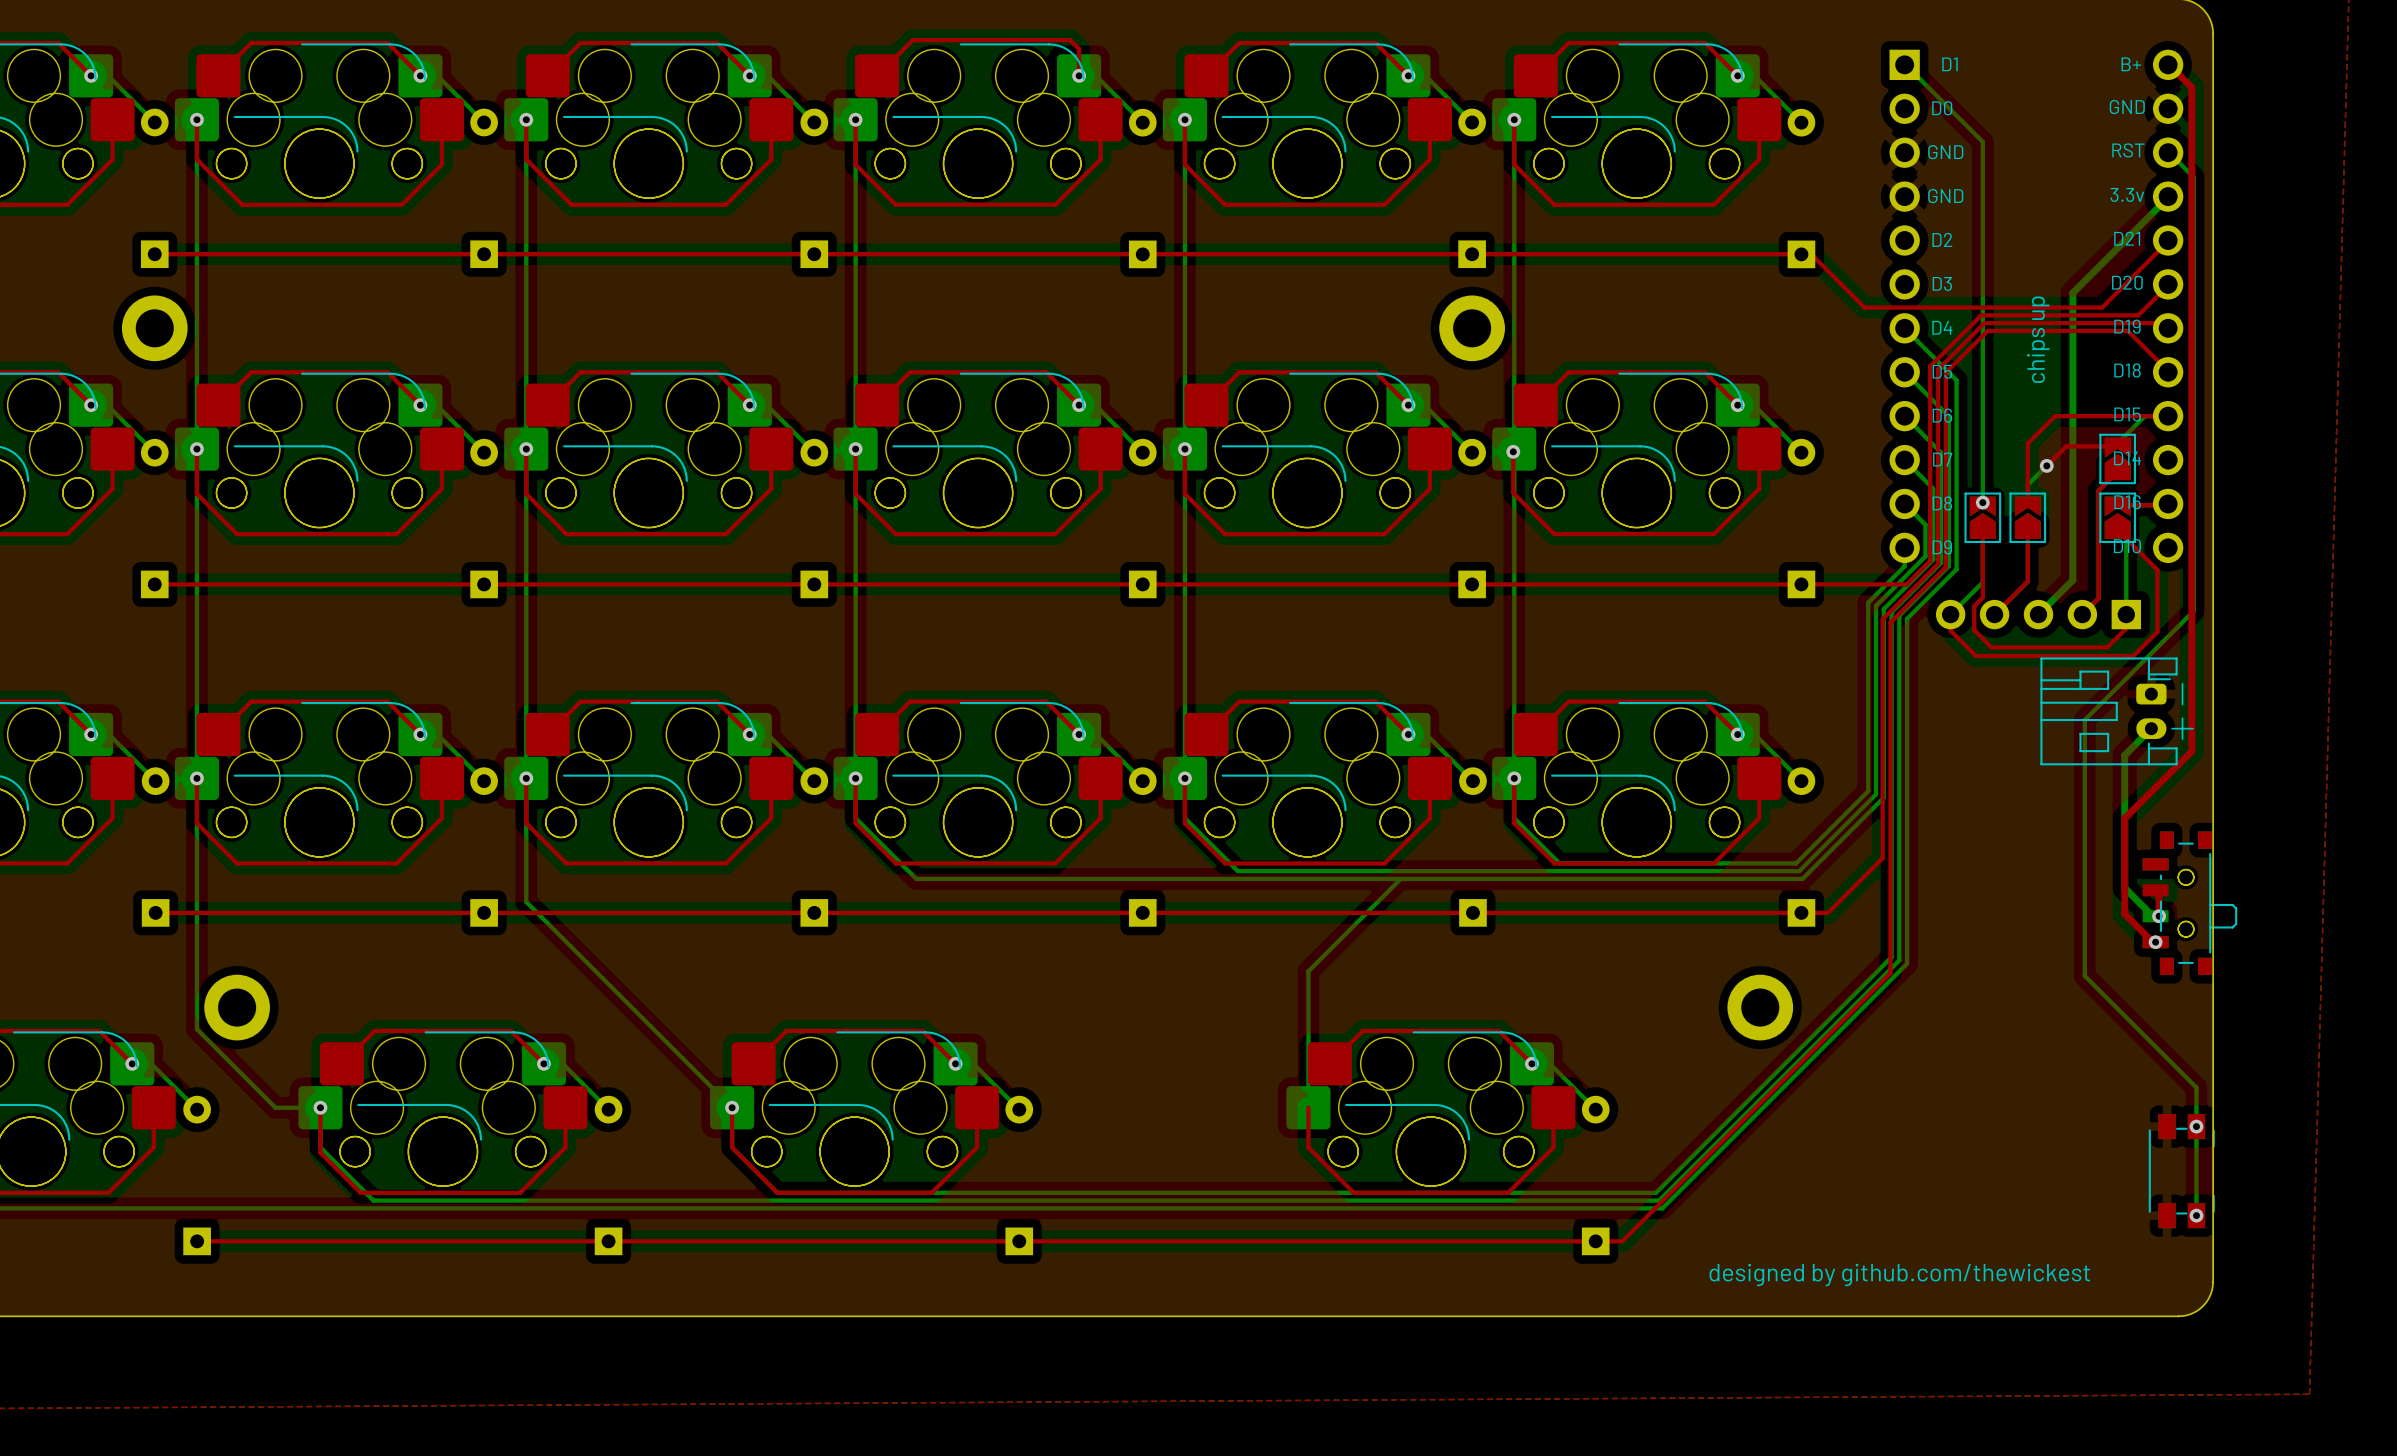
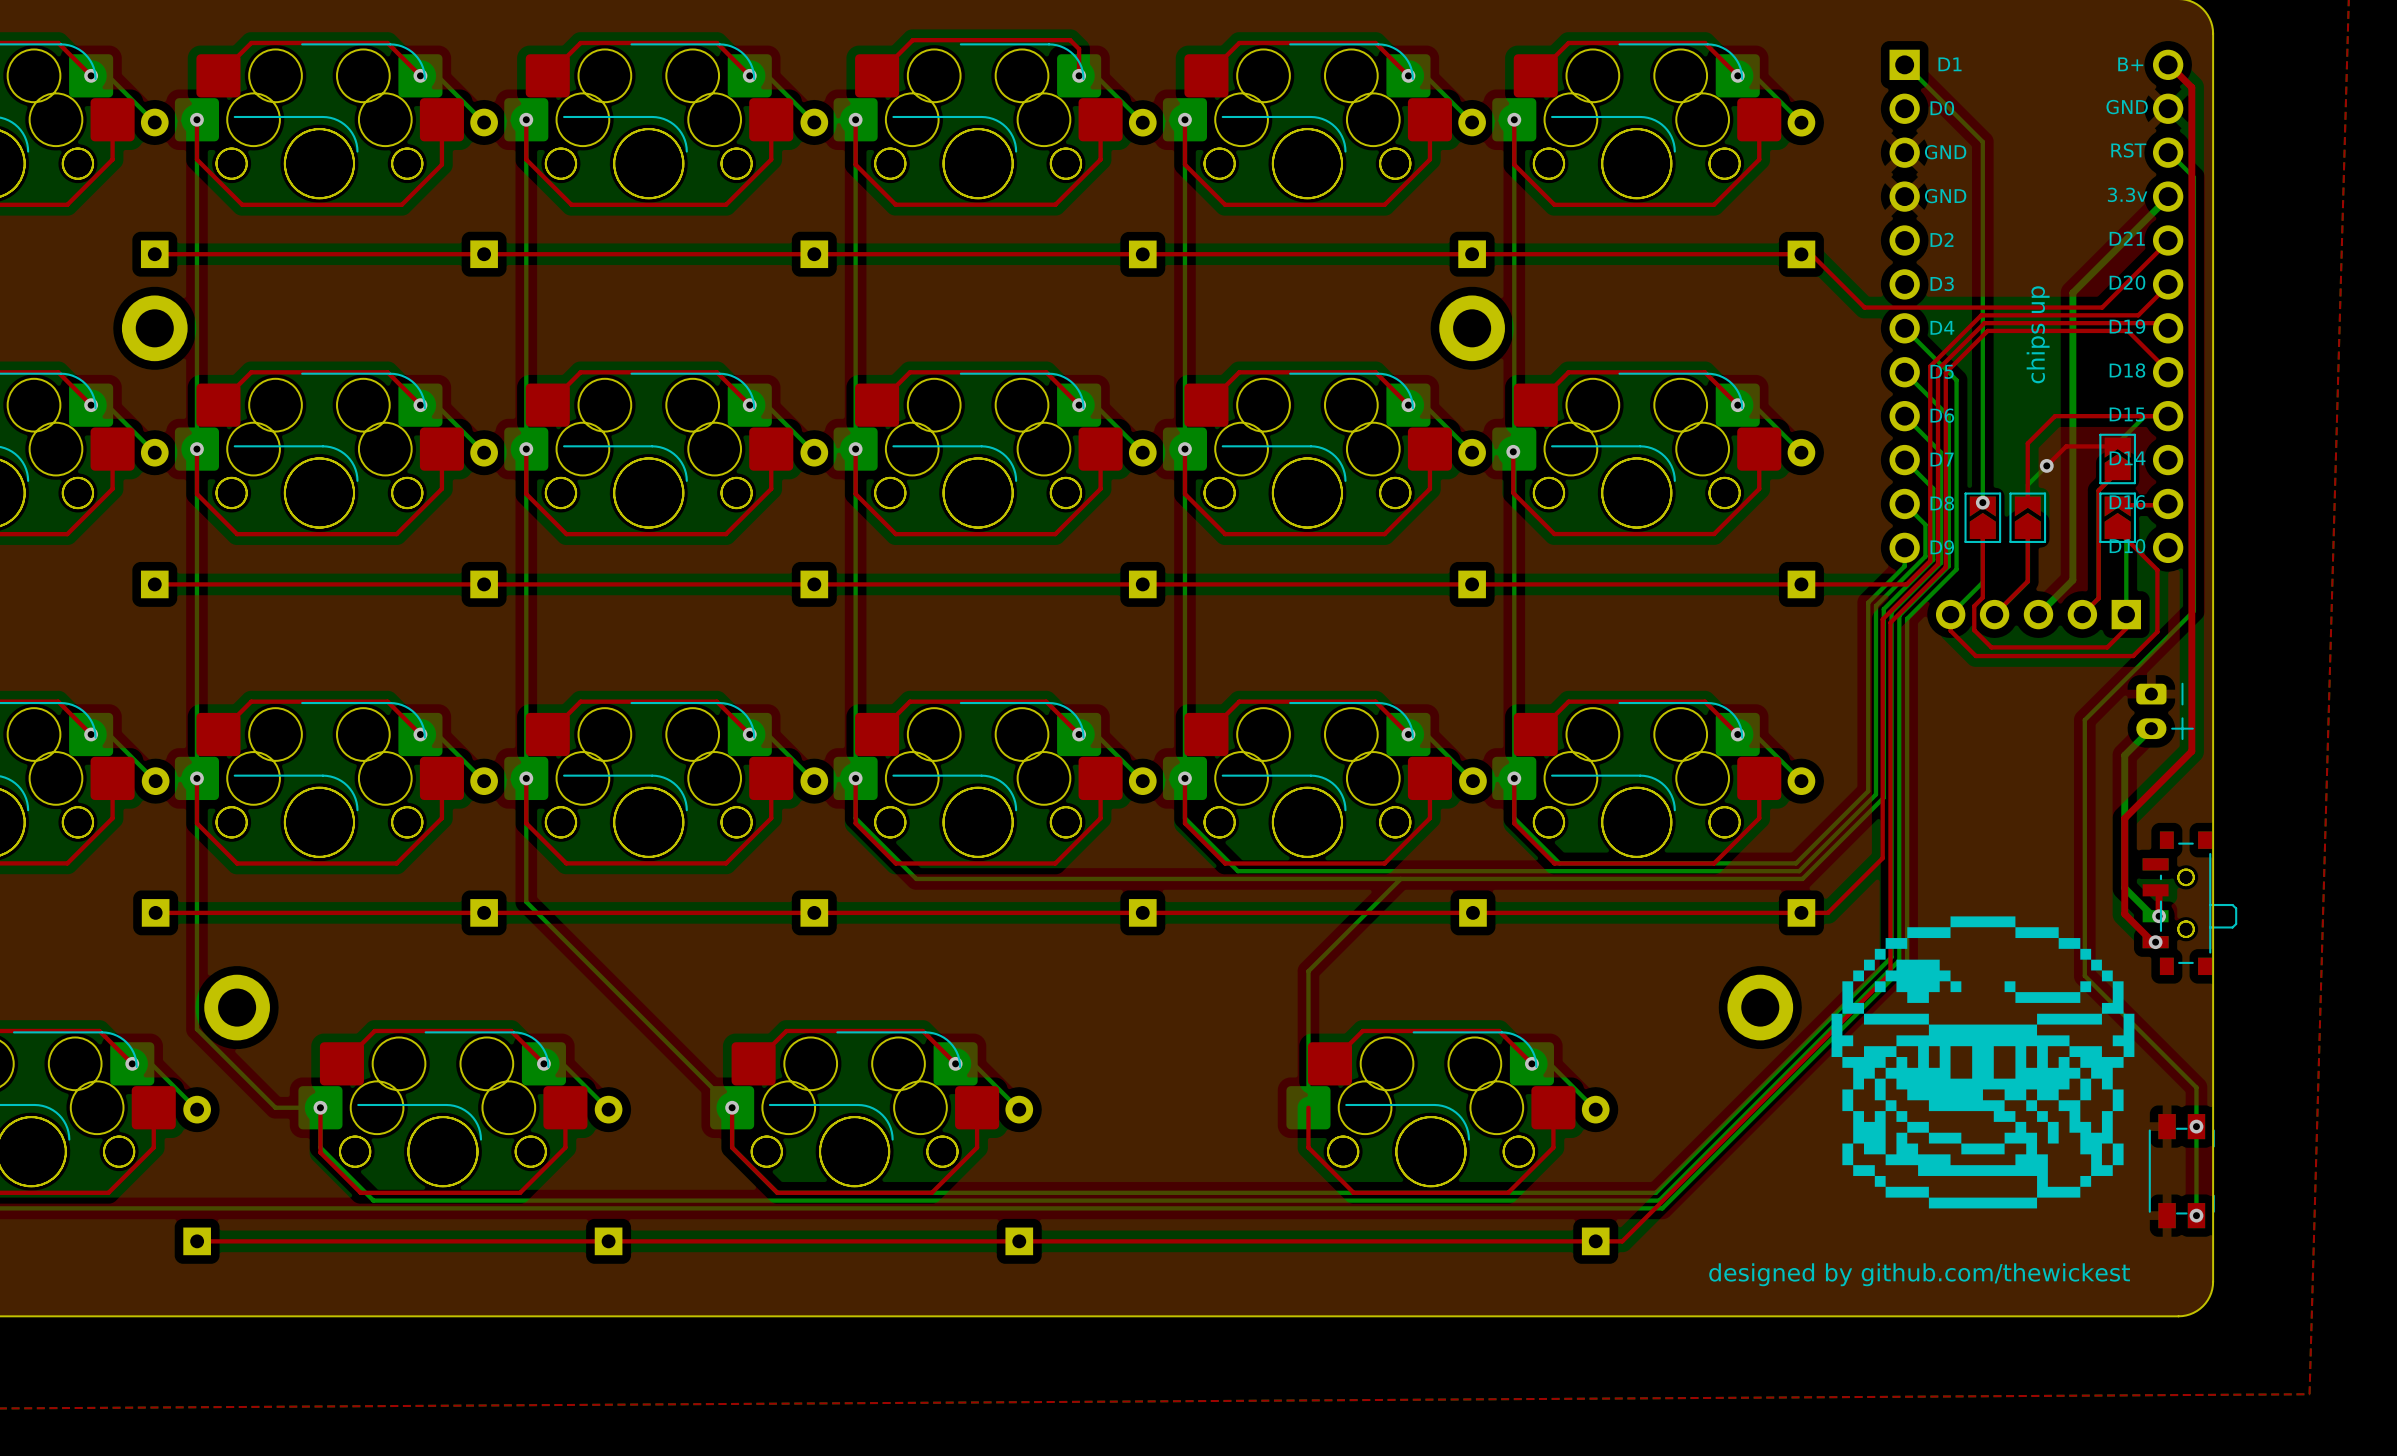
part: (2117, 711) -> none
drawing: none -> [1831, 916, 2135, 1209]

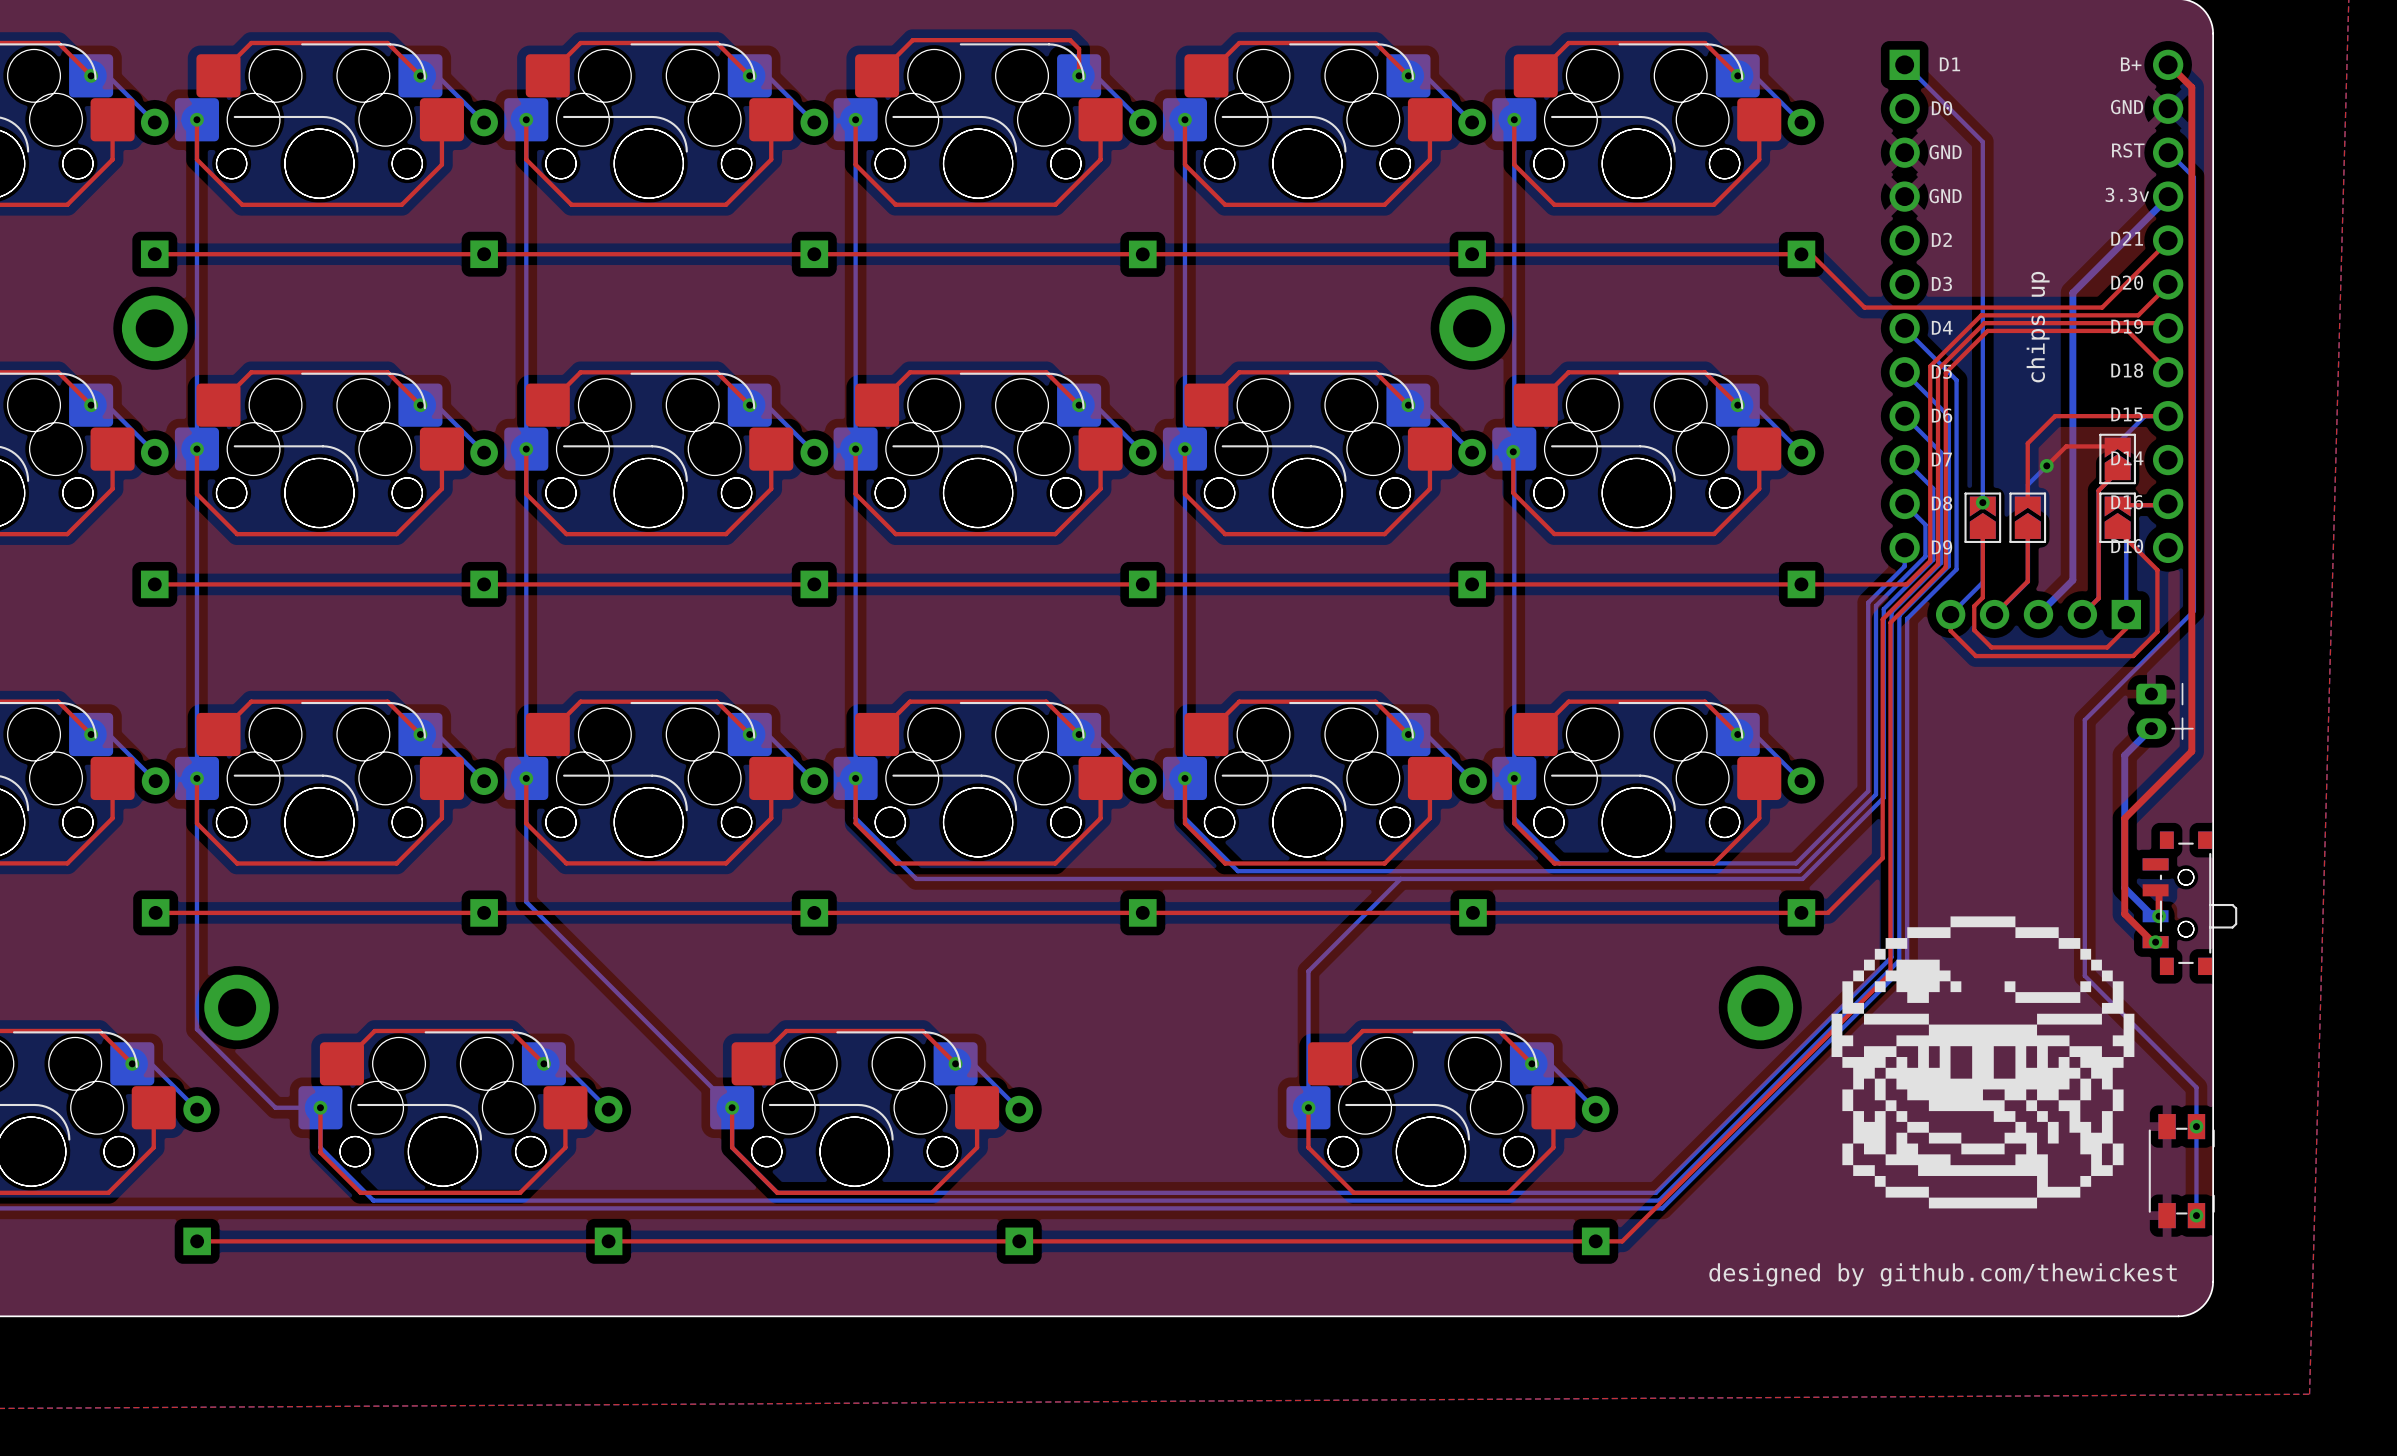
via: none -> (1308, 1107)

